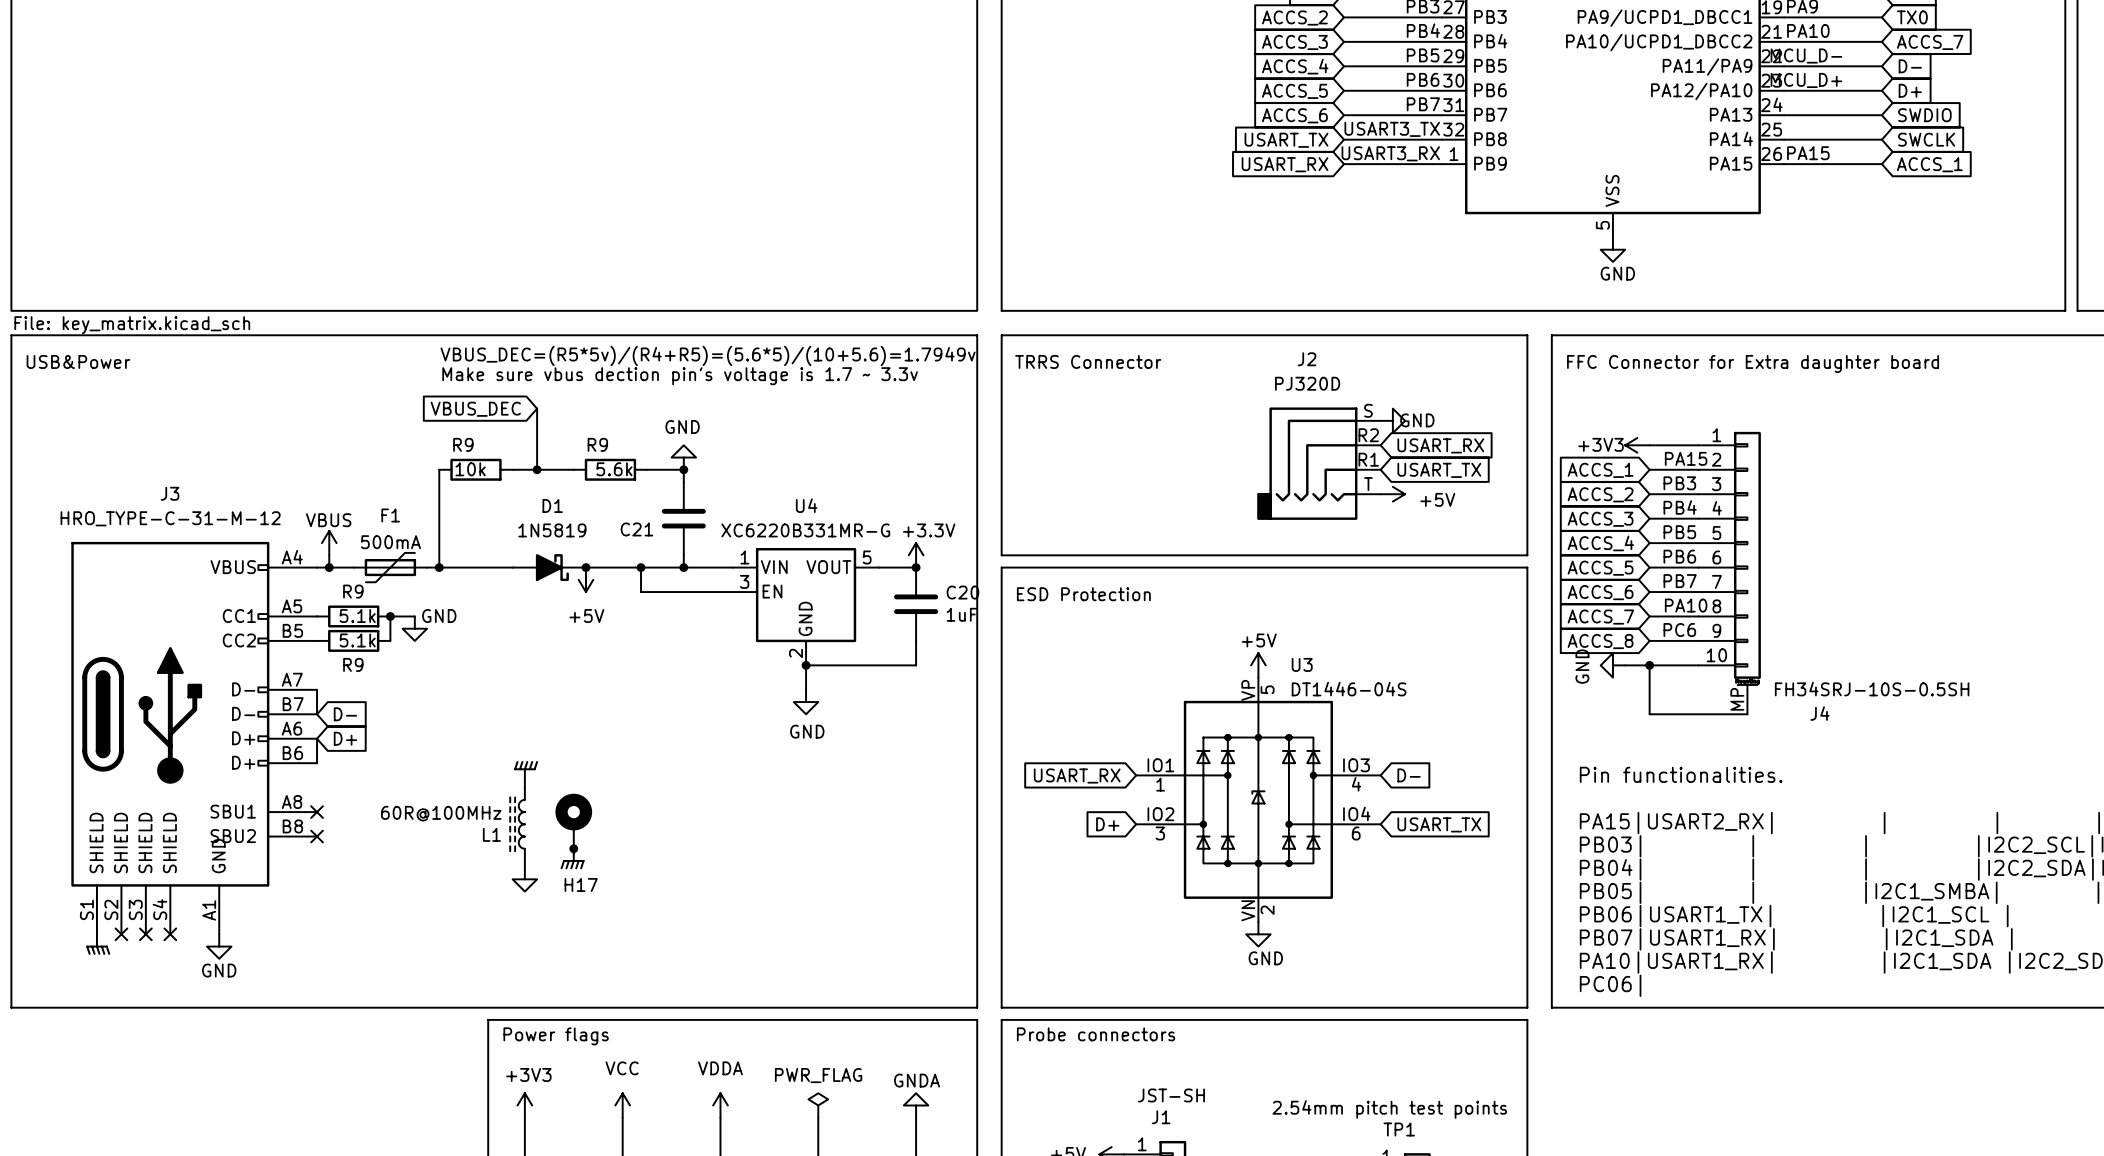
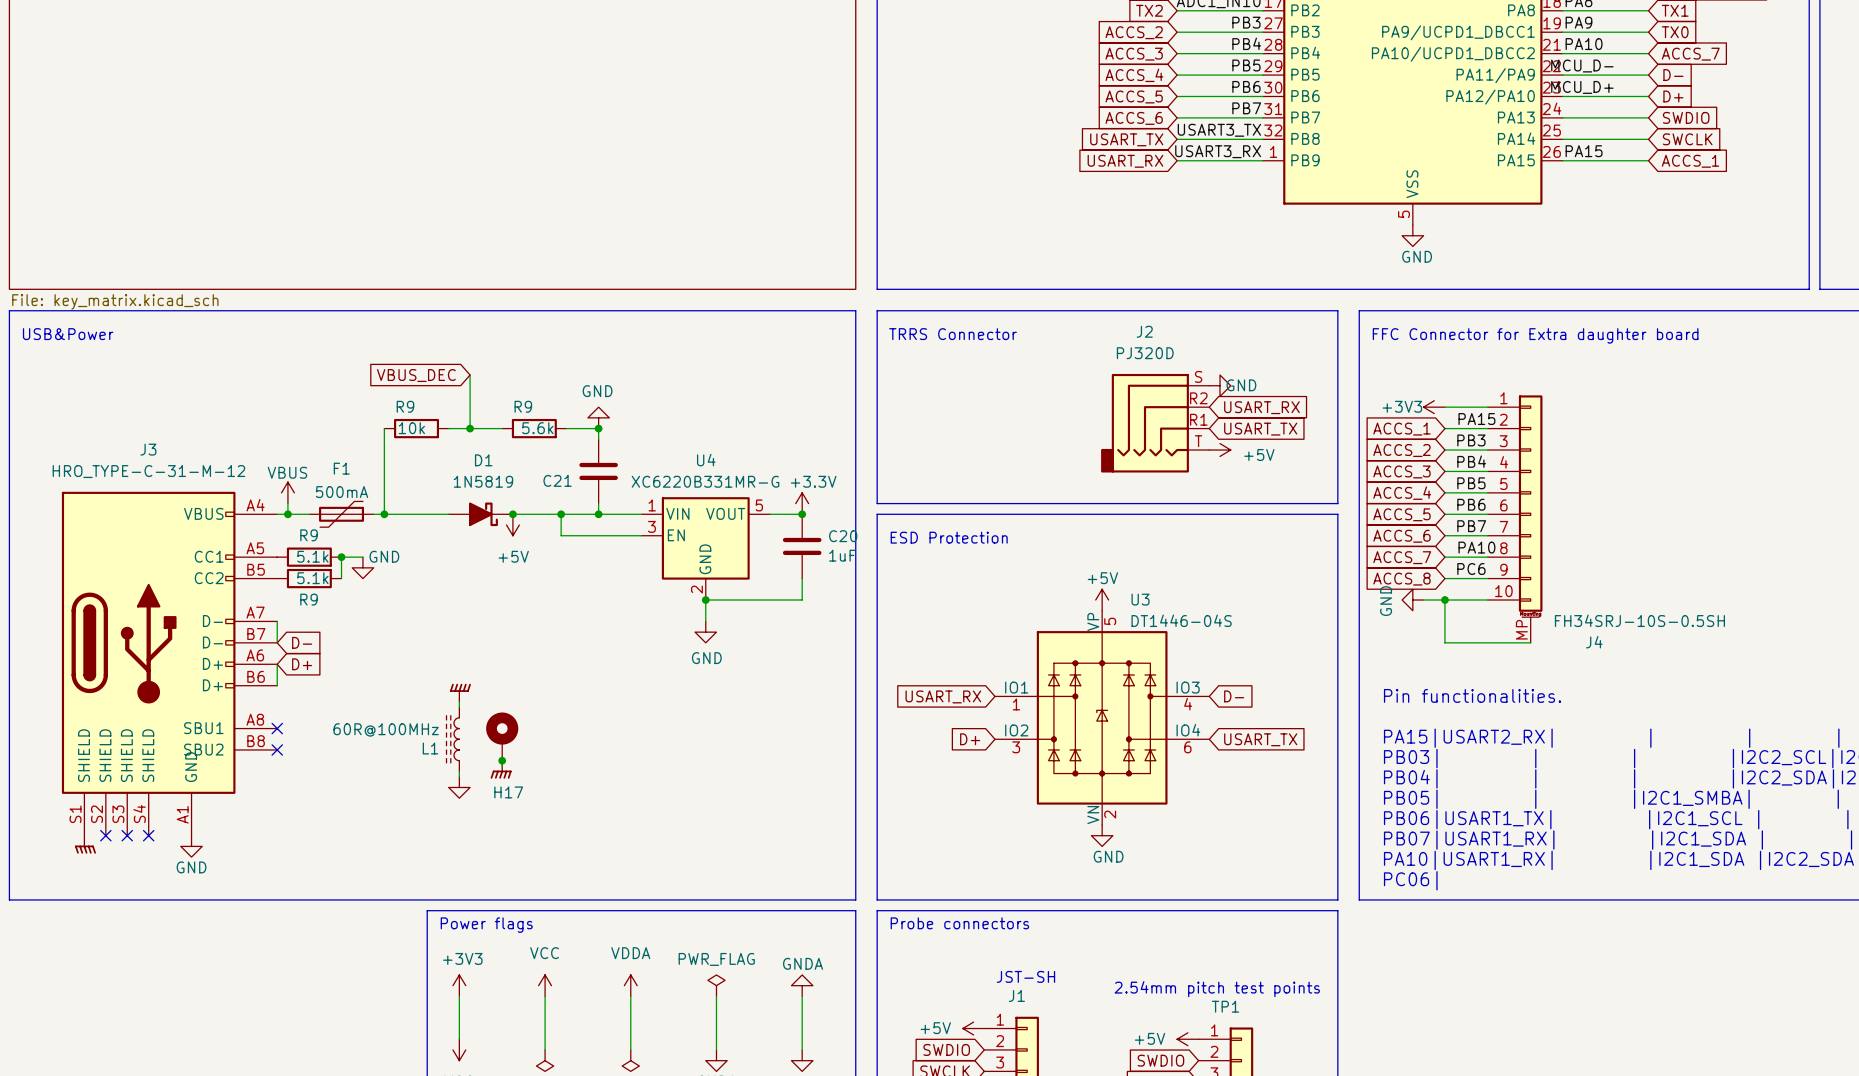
text: VBUS_DEC=(R5*5v)/(R4+R5)=(5.6*5)/(10+5.6)=1.7949v (708, 355) -> none
text: Make sure vbus dection pin's voltage is 1.7 ~ 3.3v (680, 376) -> none

